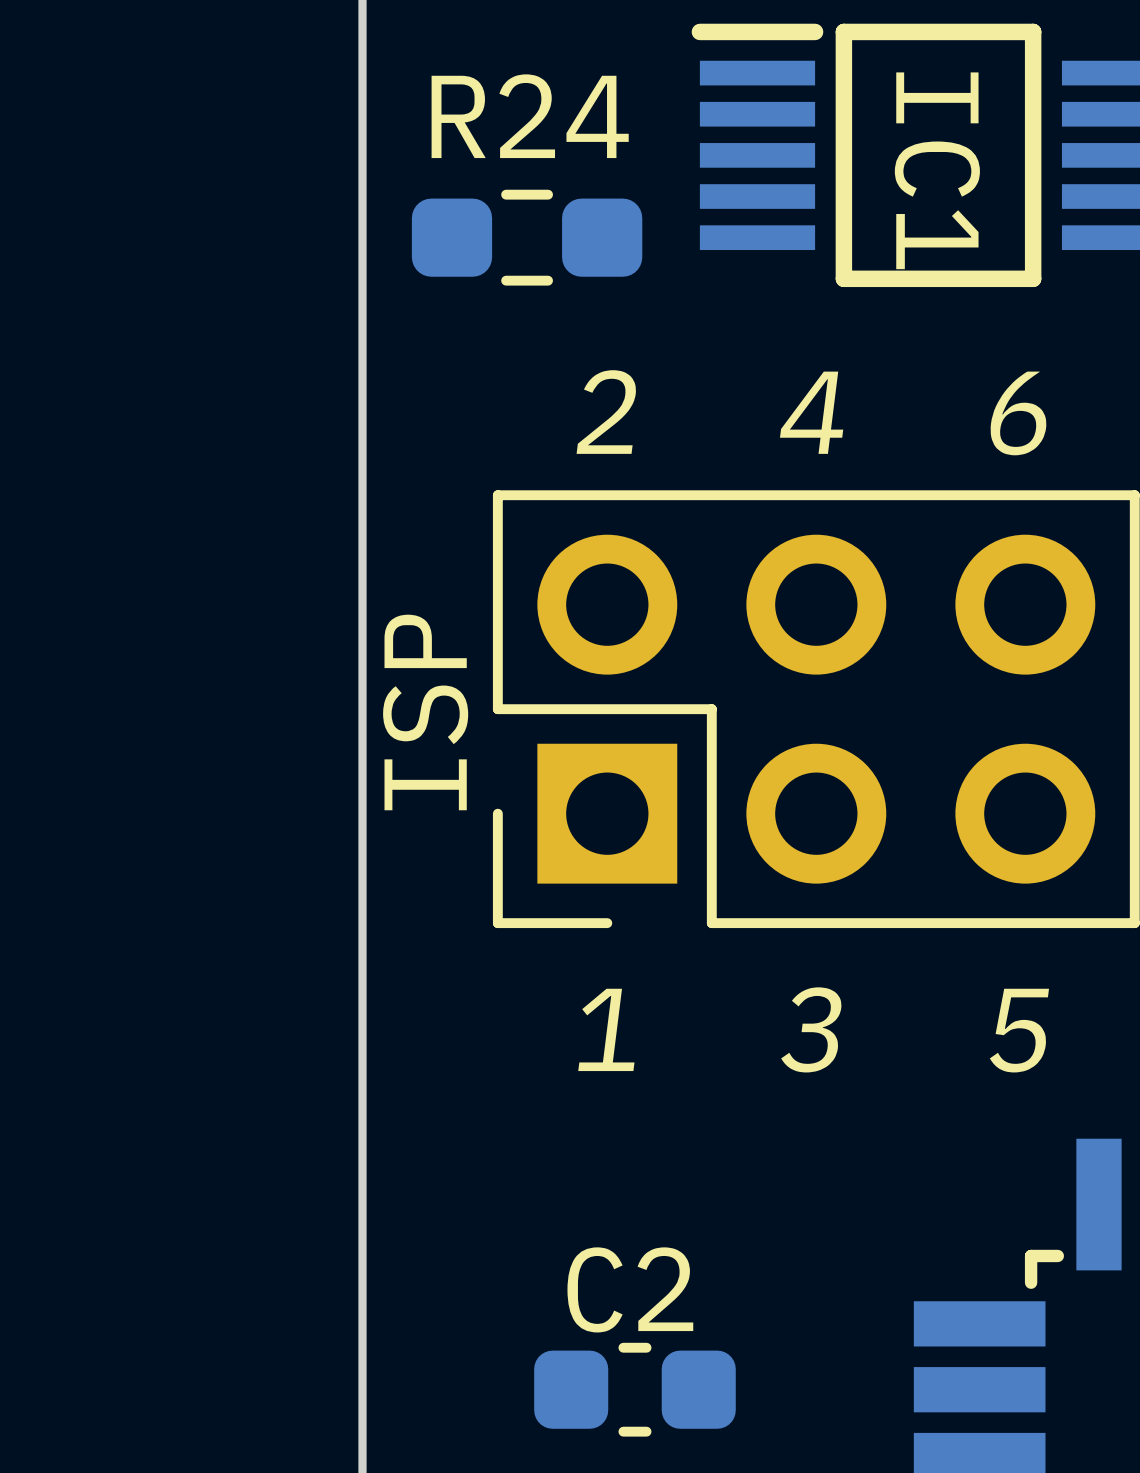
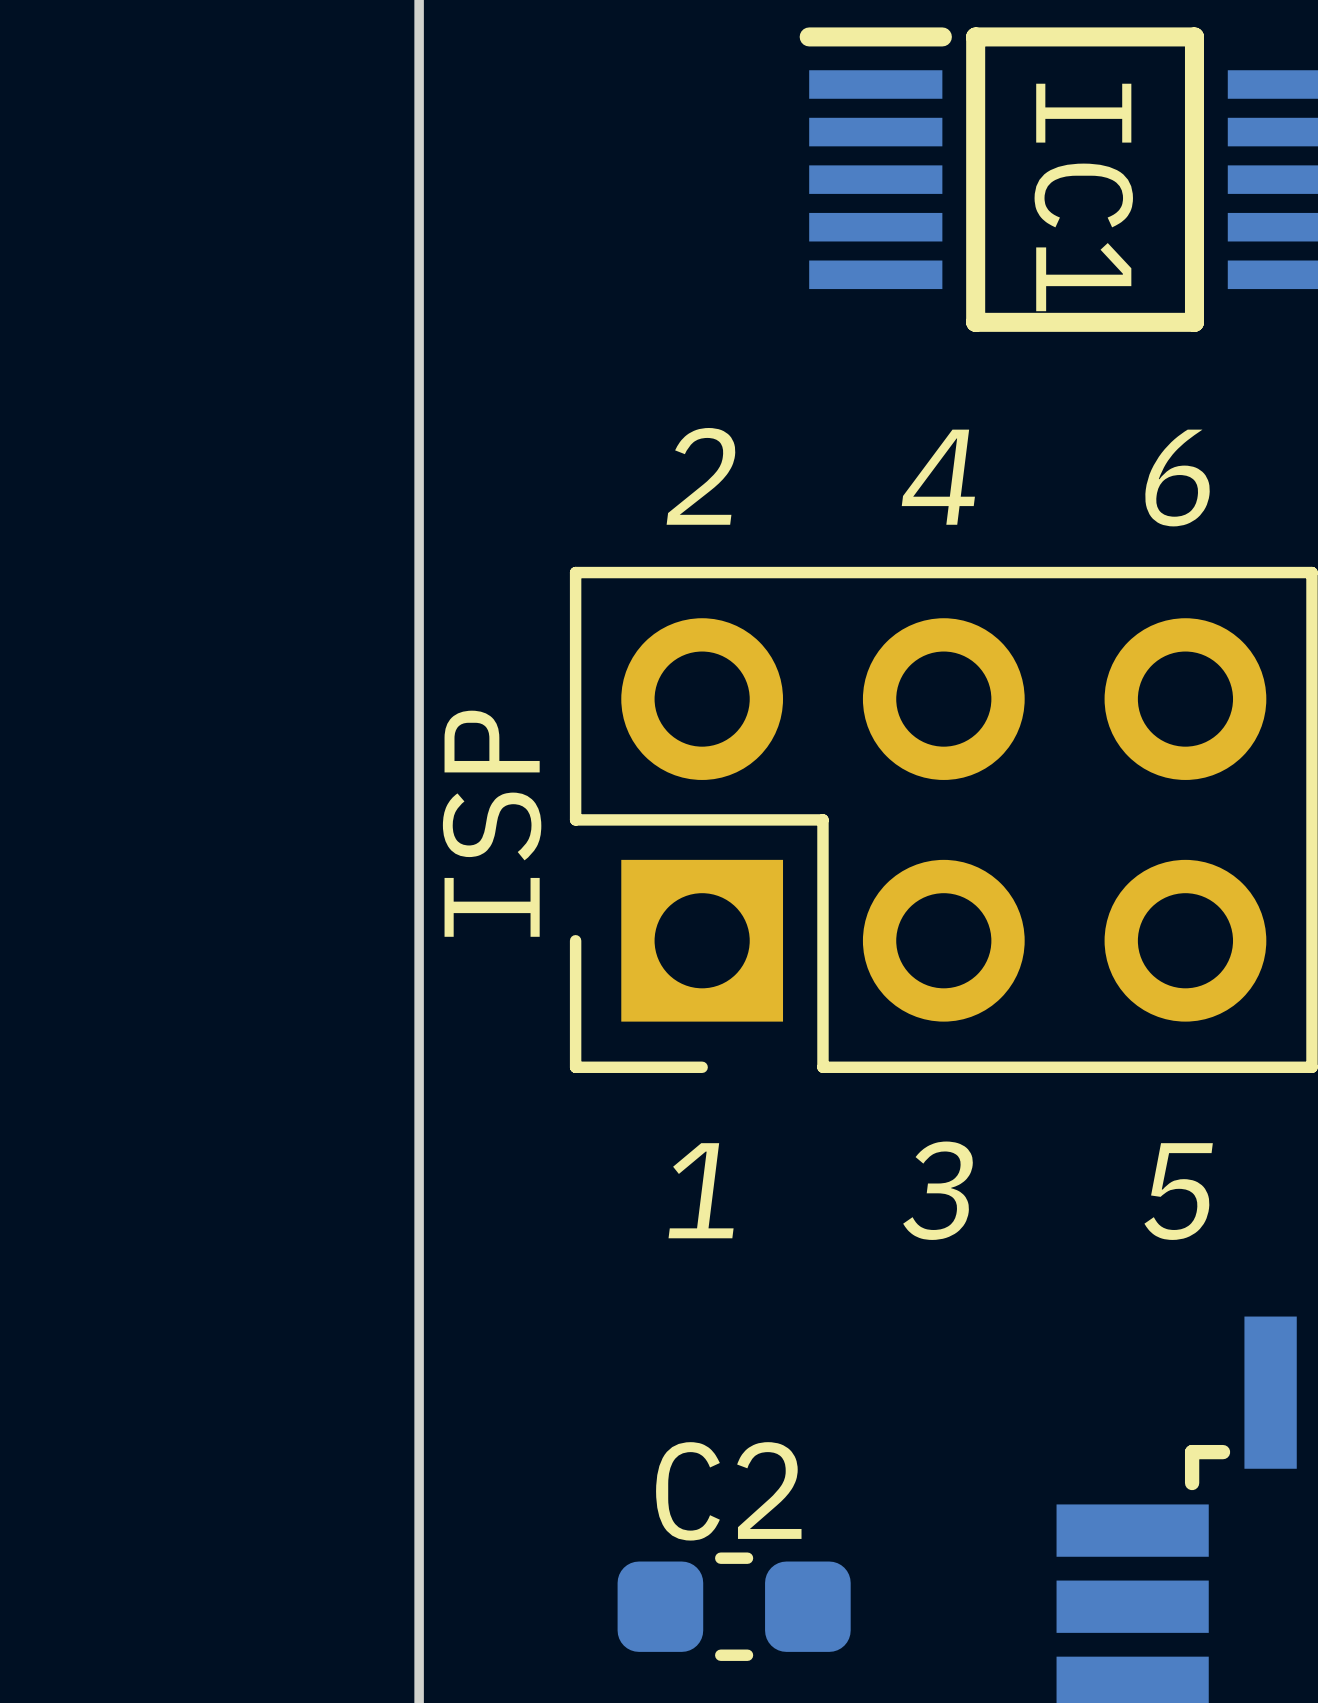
R24: (527, 237) -> none

